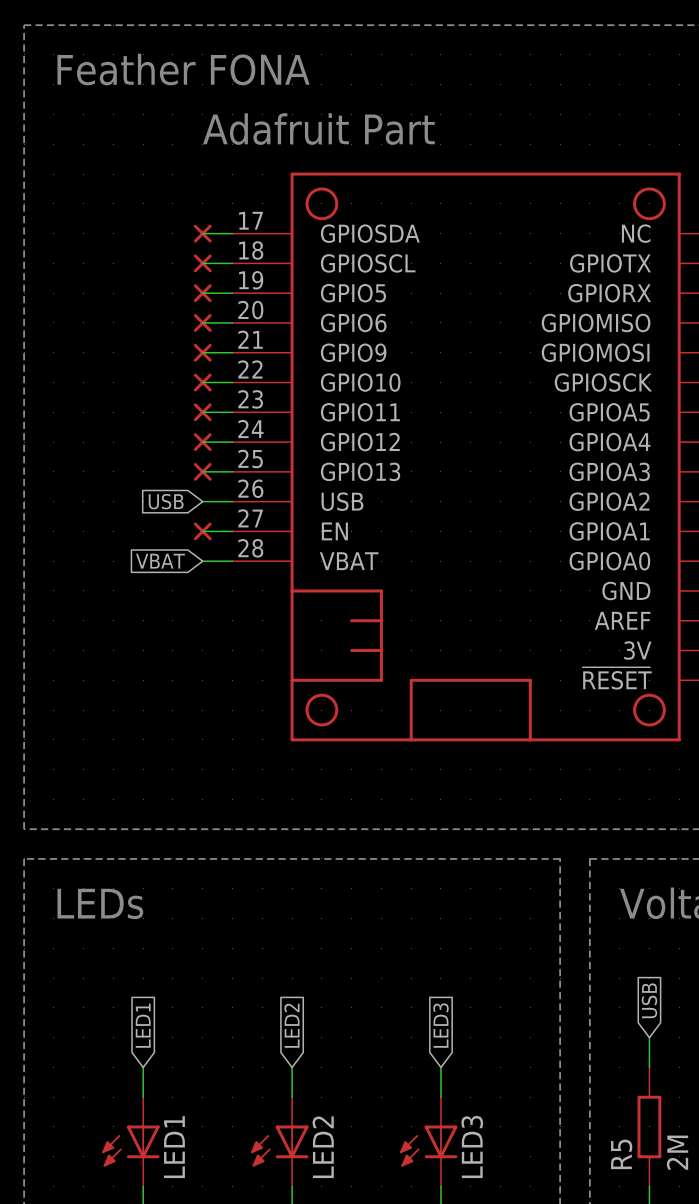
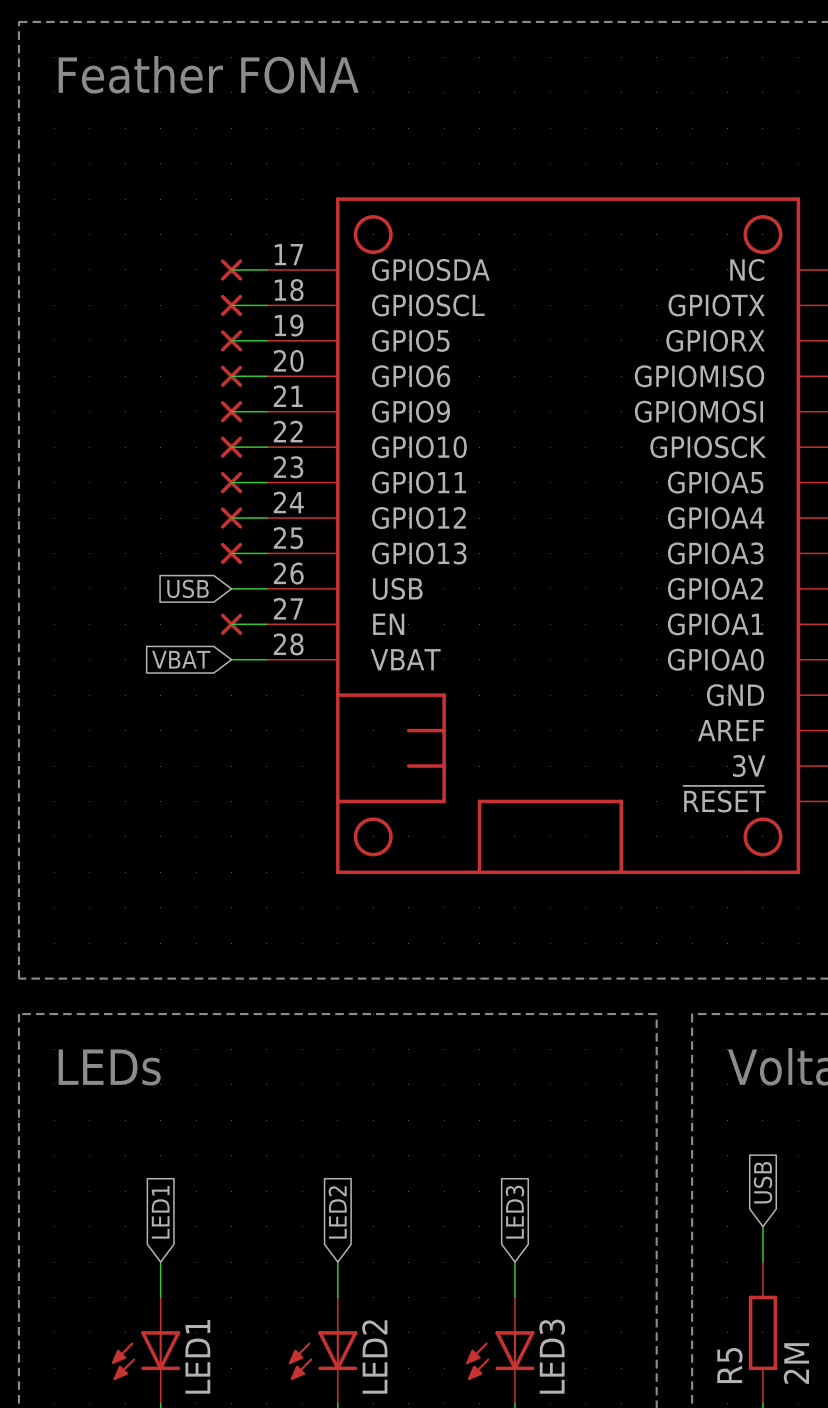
text: Adafruit Part (318, 129) -> none

